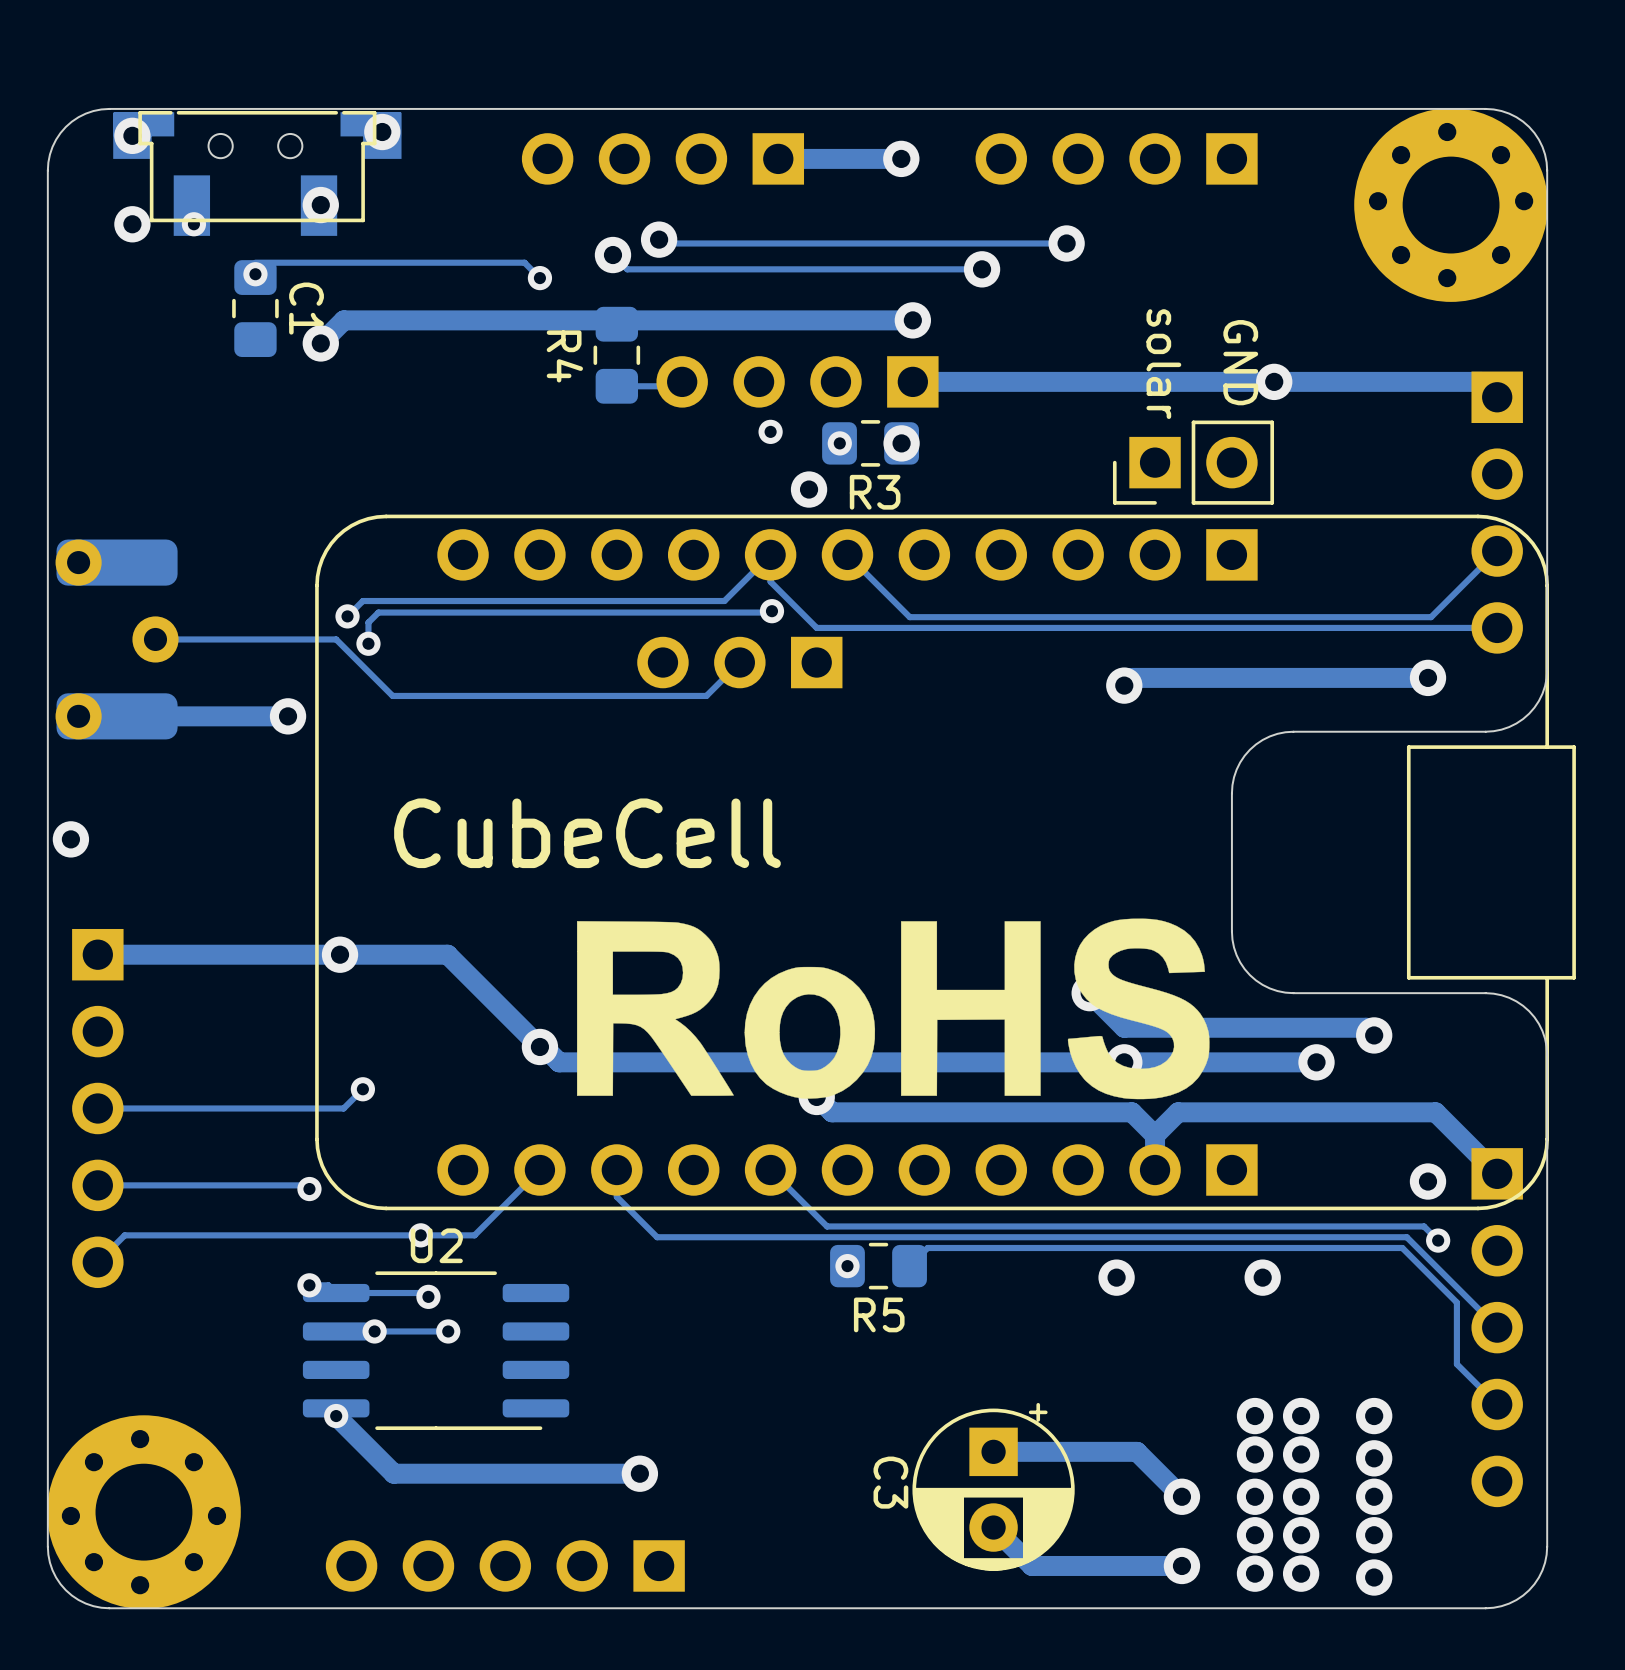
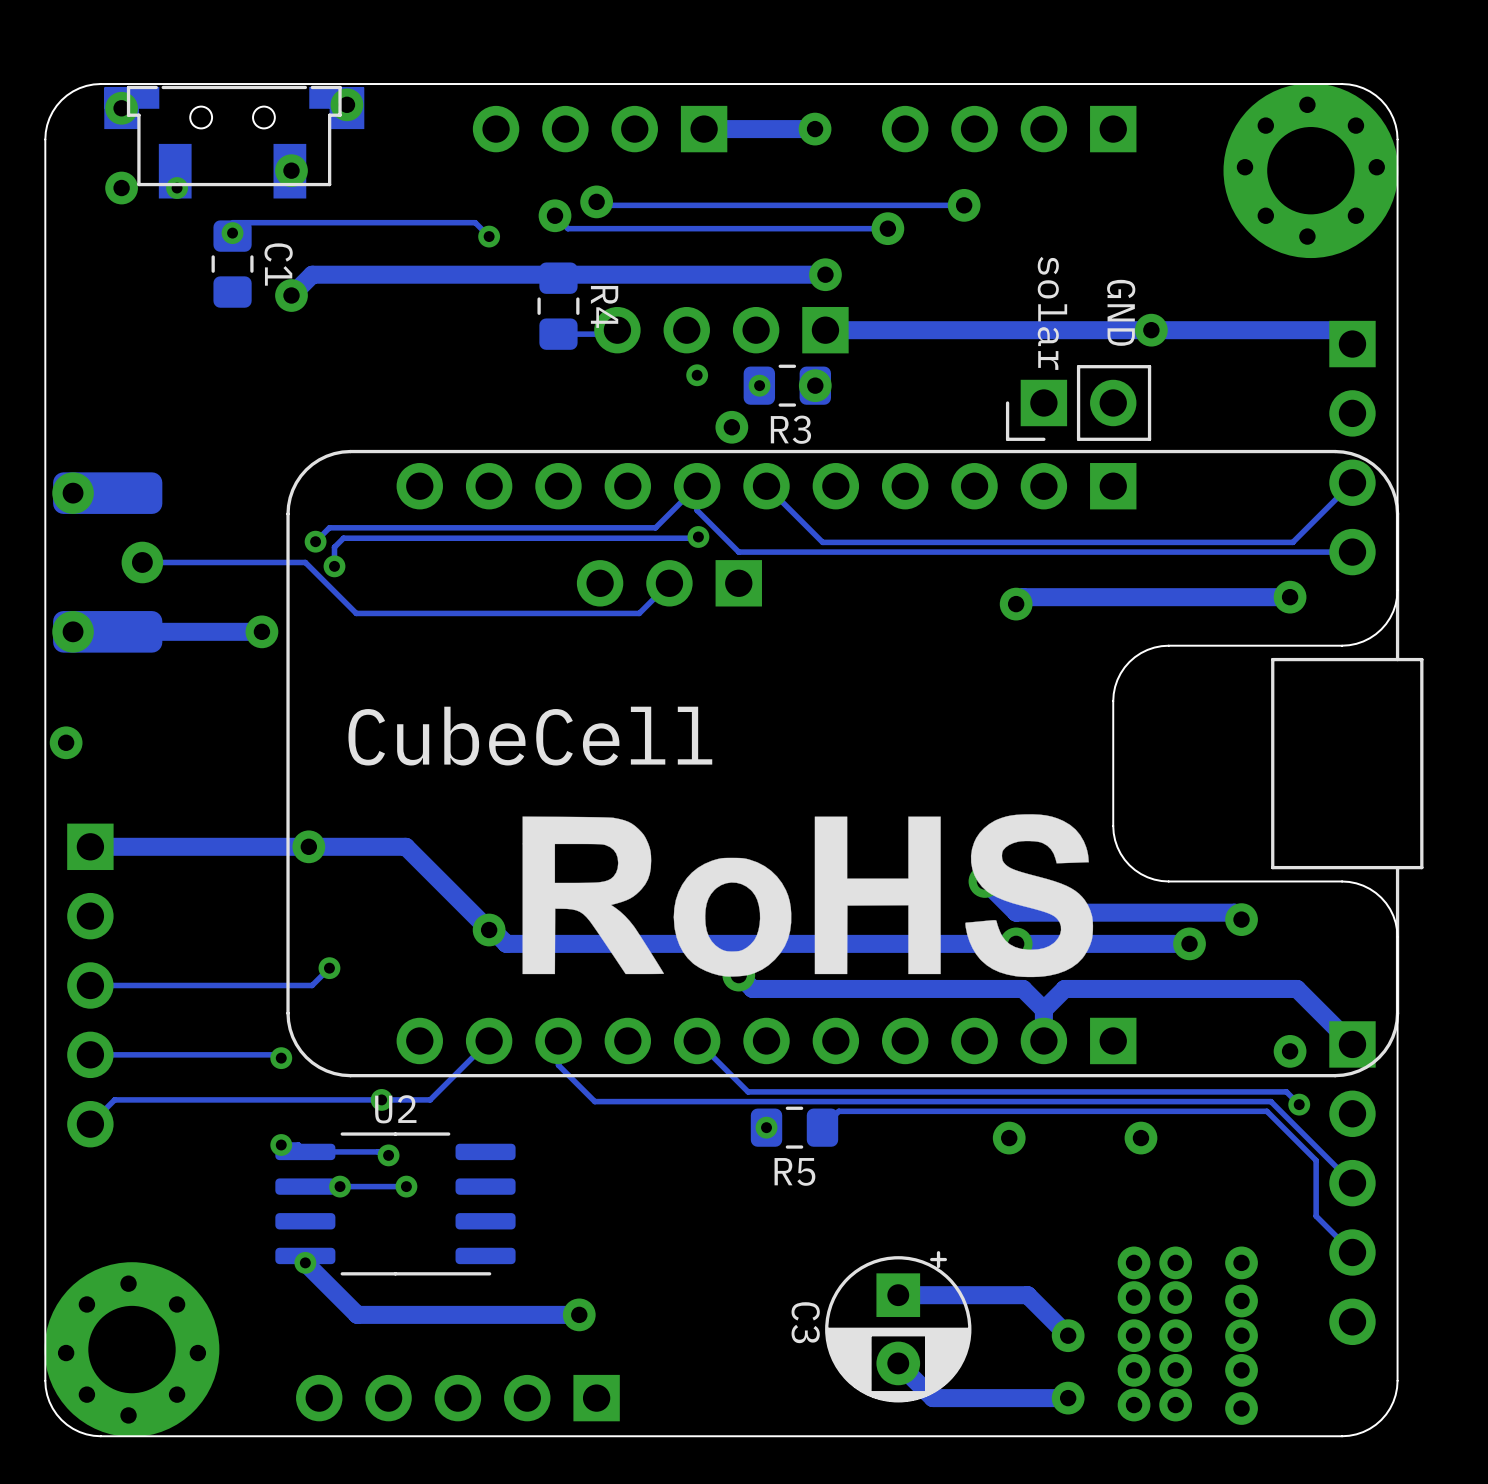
R4 name position: R4 (564, 356) -> R4 (604, 306)

